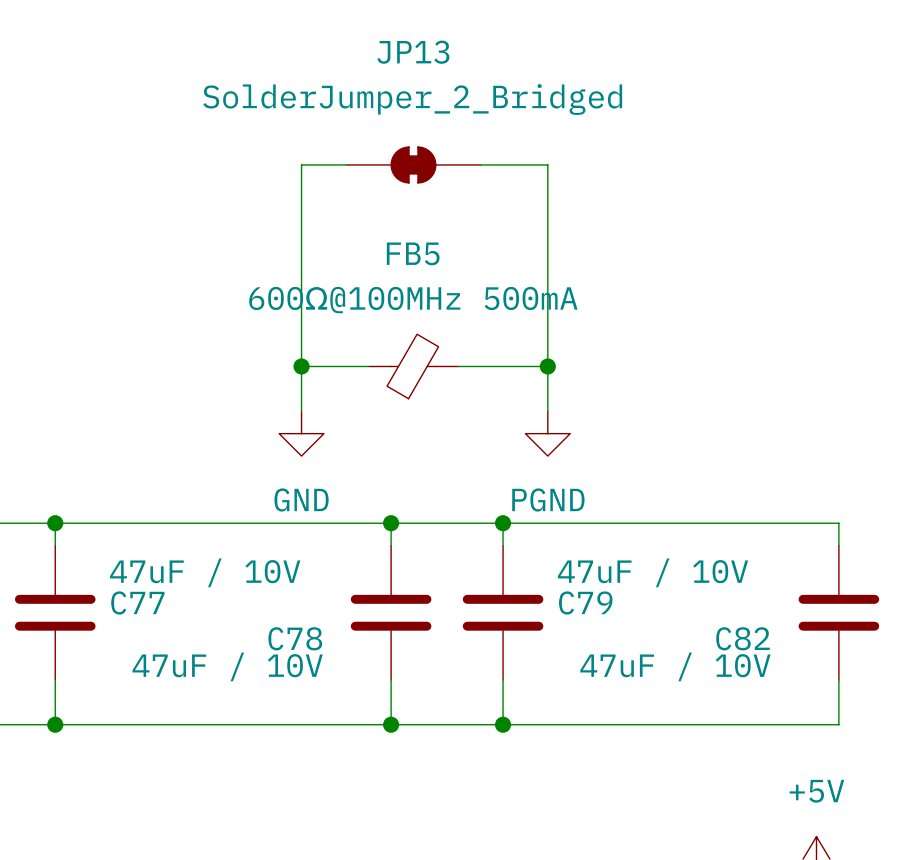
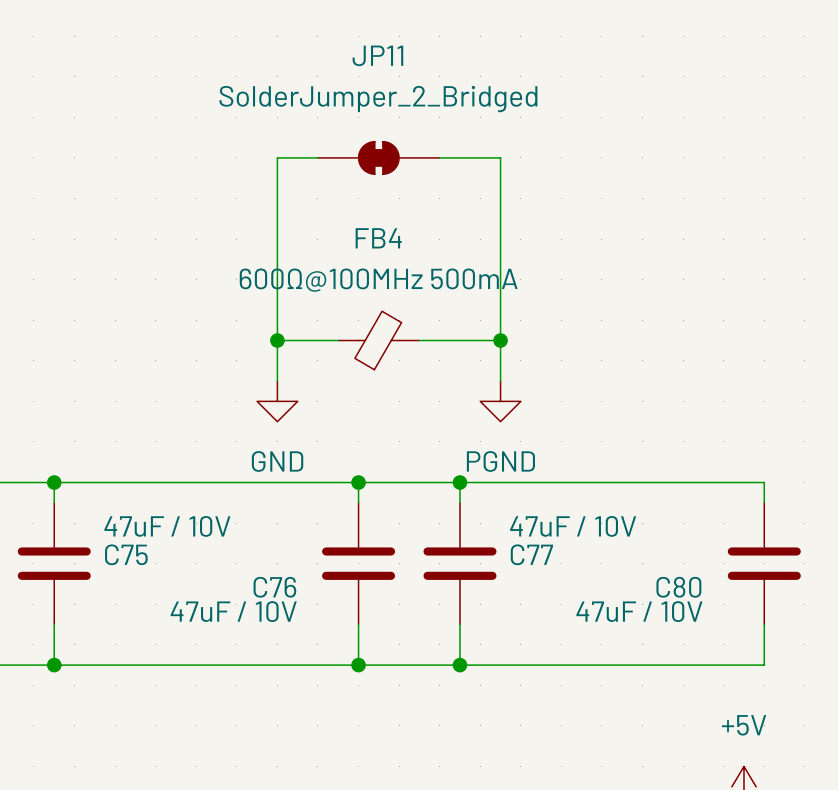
JP13 name: JP13 (413, 52) -> JP11 (377, 55)
FB5 name: FB5 (413, 253) -> FB4 (378, 238)
C77 name: C77 (137, 602) -> C75 (126, 554)
C79 name: C79 (585, 602) -> C77 (531, 554)
C78 name: C78 (295, 638) -> C76 (274, 587)
C82 name: C82 (742, 638) -> C80 (678, 587)

